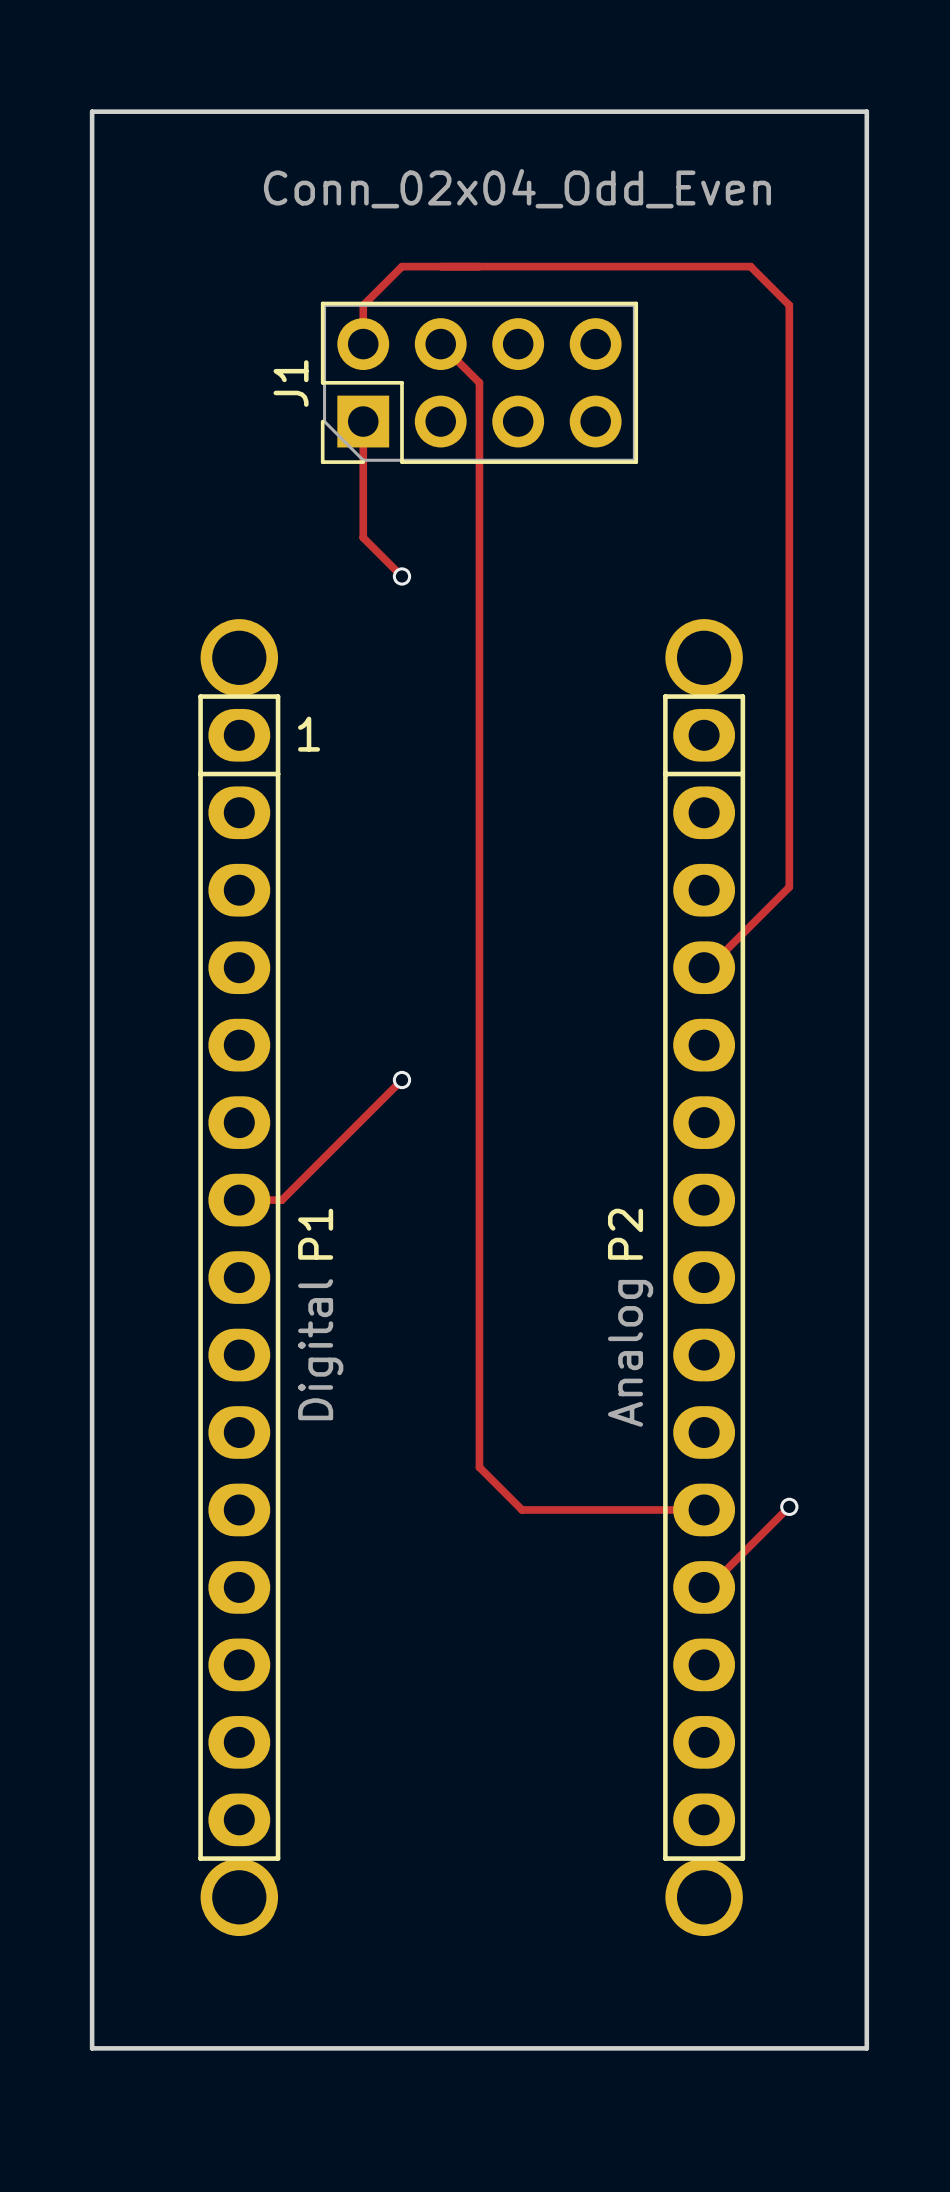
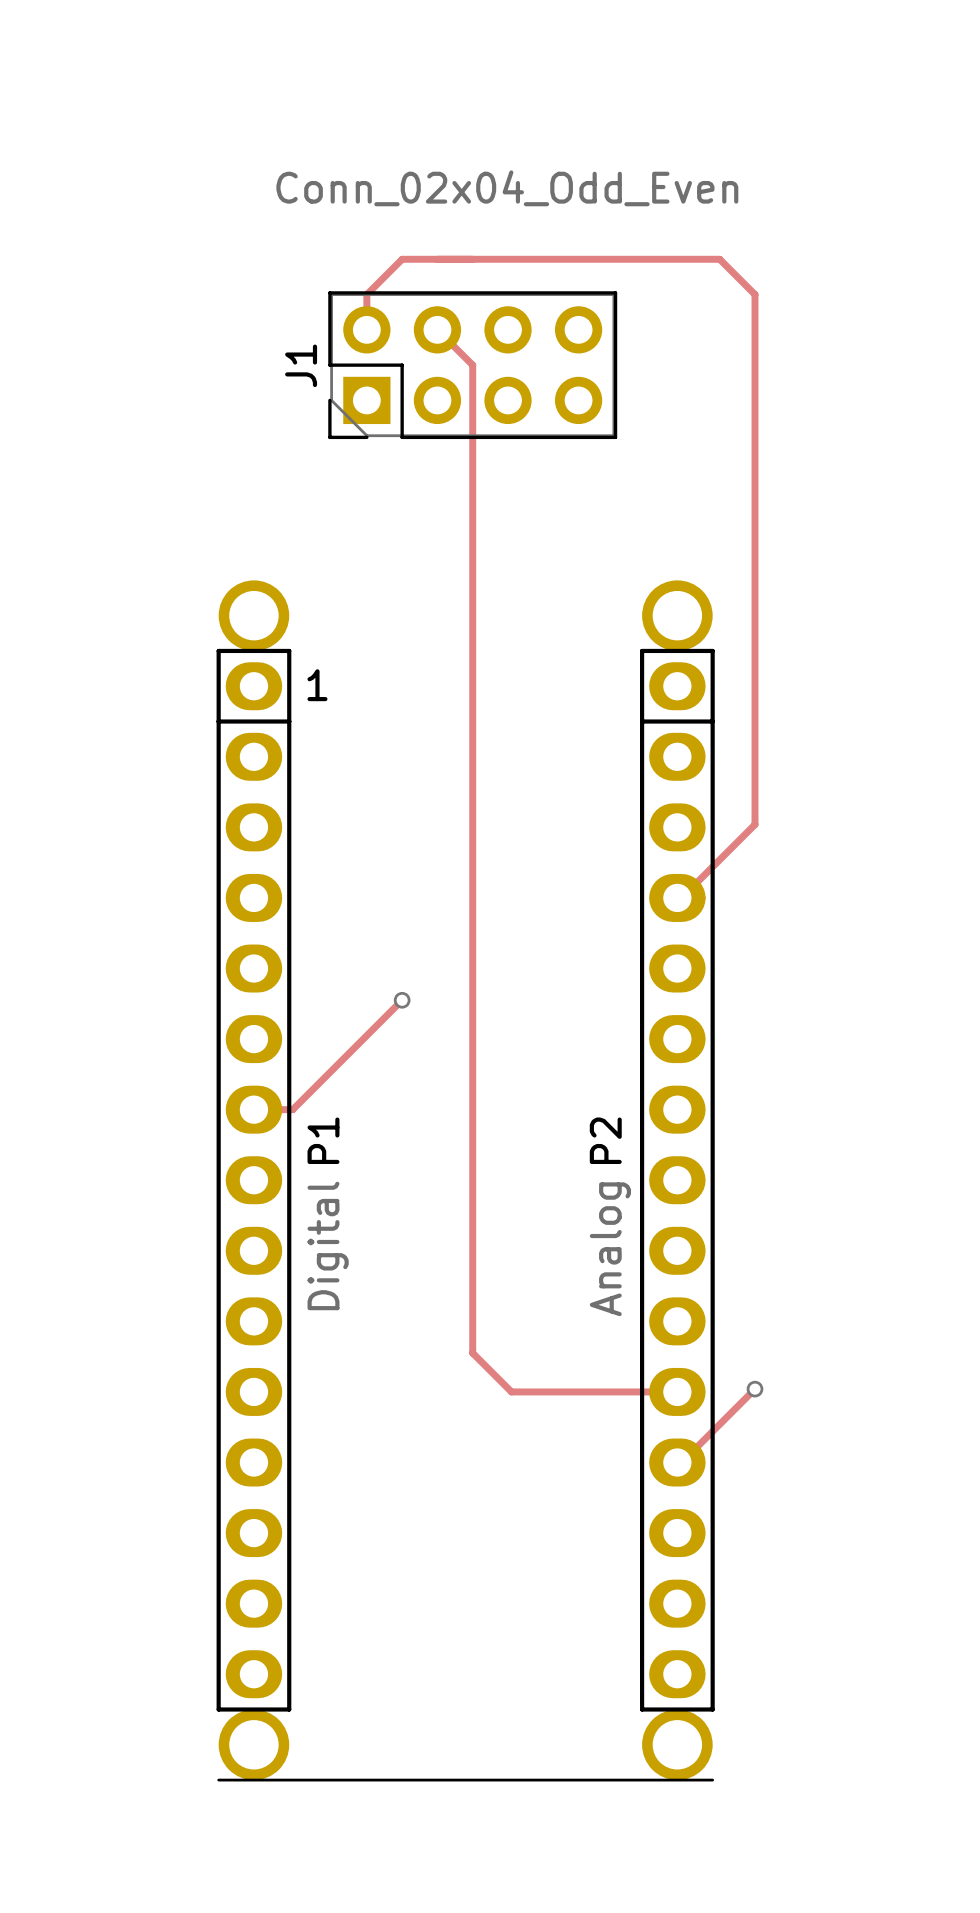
board edge: (92, 111) (92, 2048) (866, 2048) (866, 111) (92, 111) -> none
track: (363, 421) (363, 537) (401, 576) -> none
via: (401, 576) -> none
board edge: none -> (218, 1780) (712, 1780)

